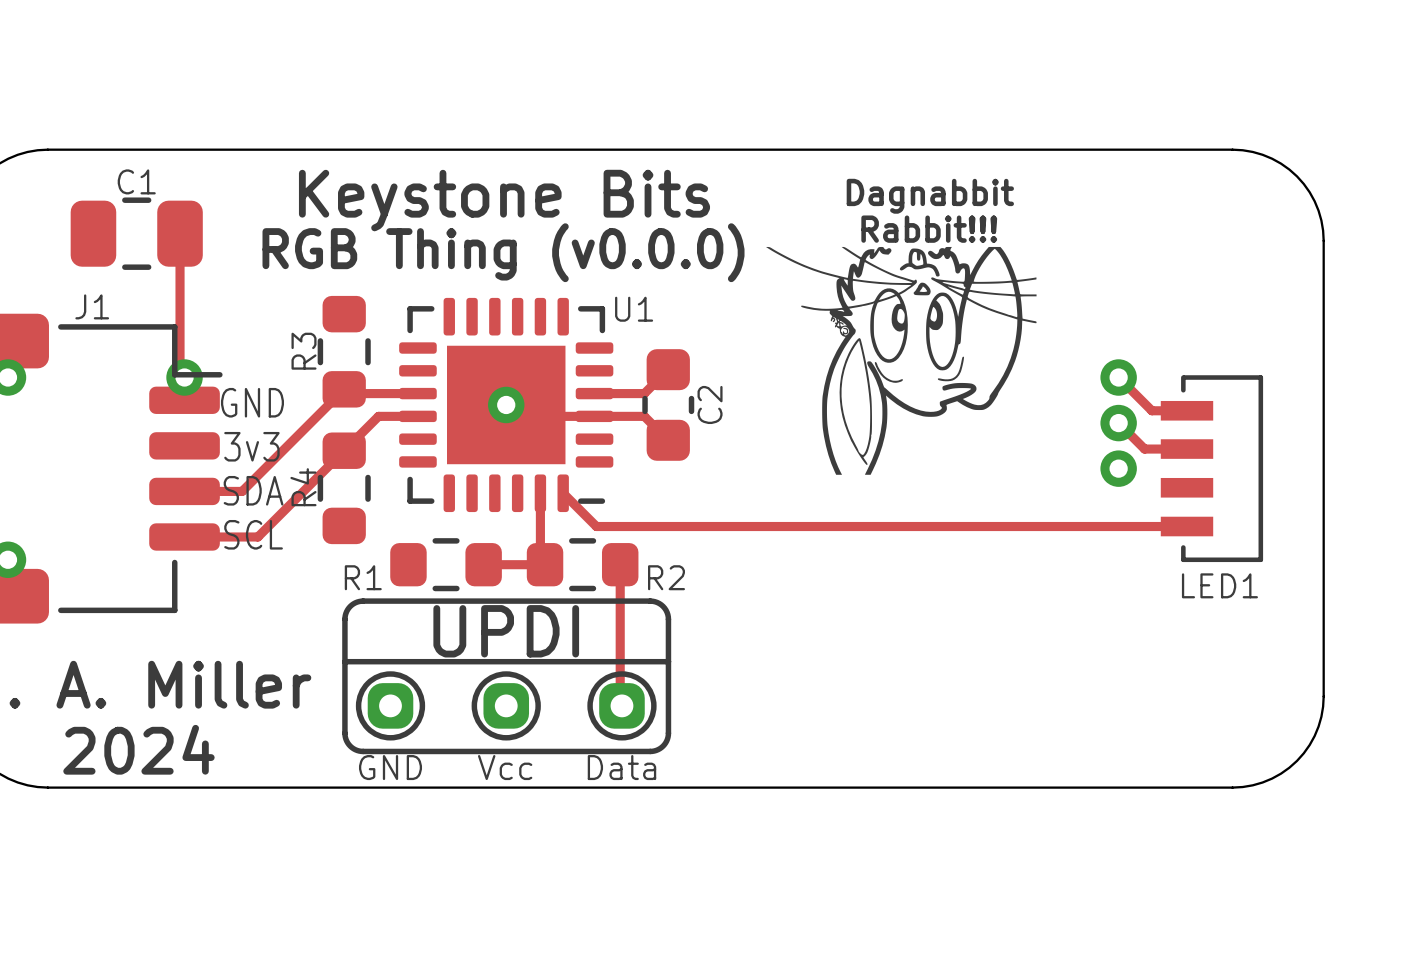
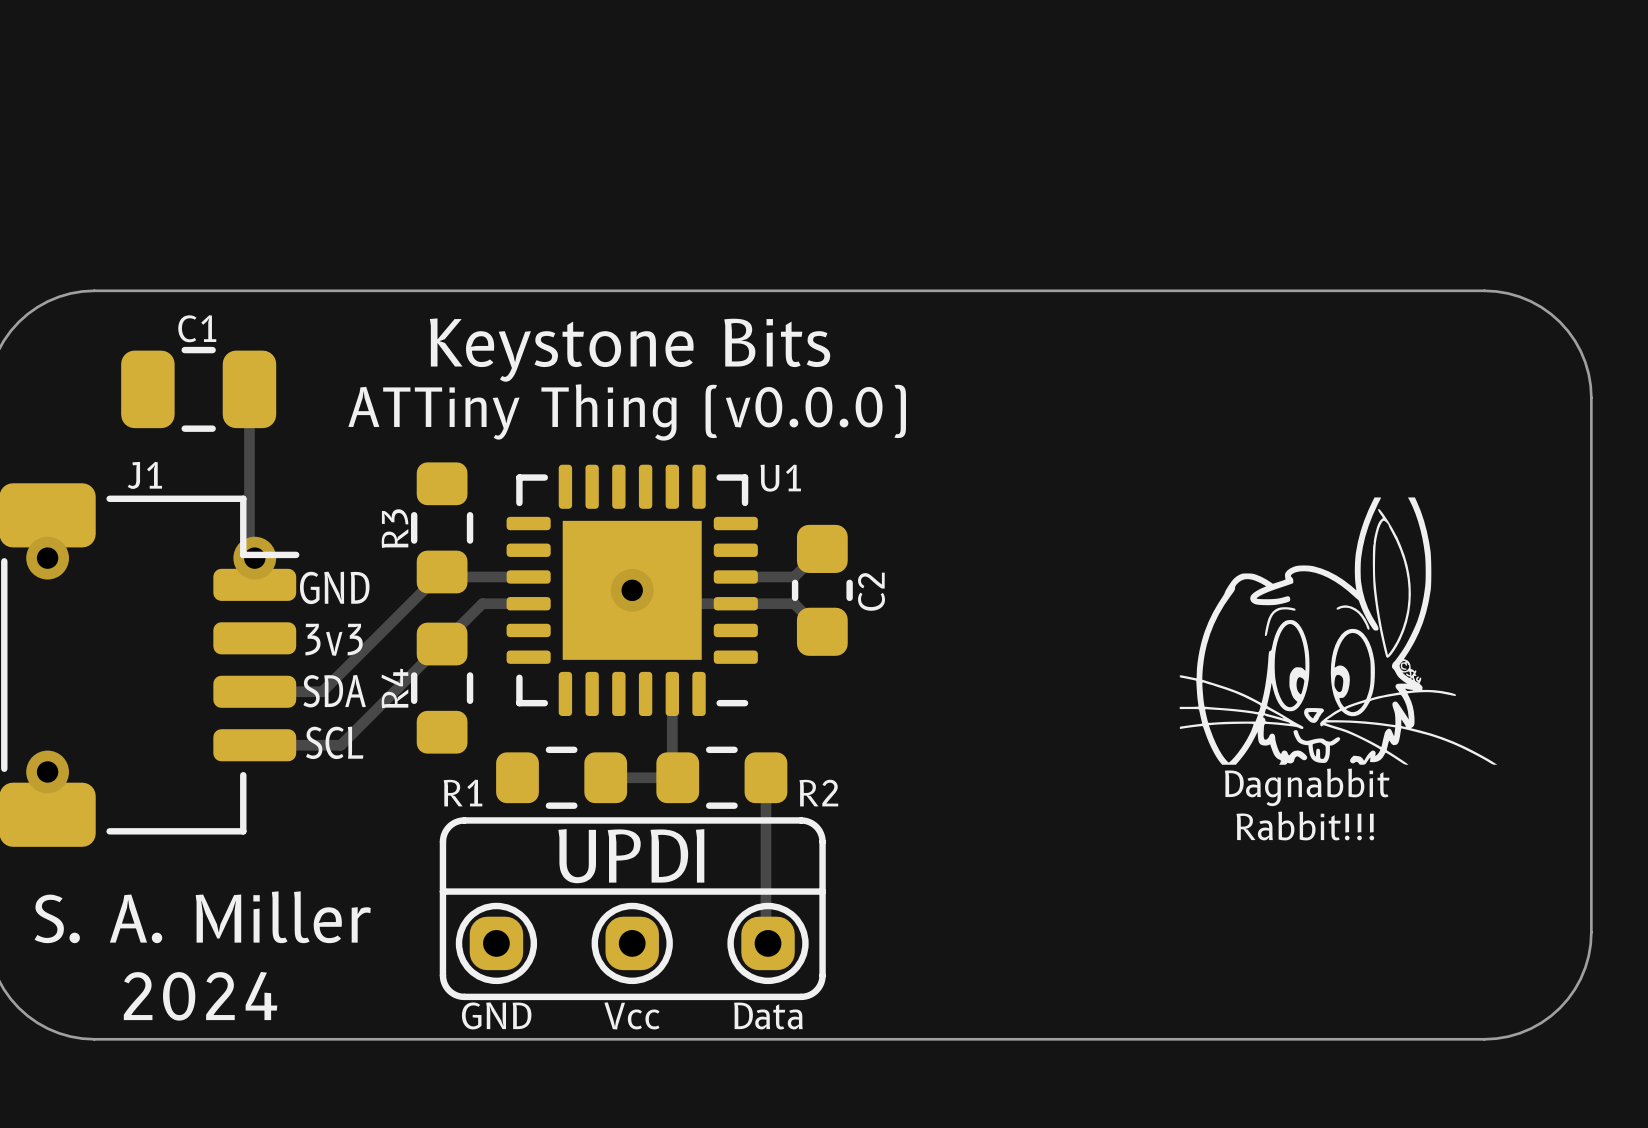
drawing: [766, 246, 1037, 475] -> none
text: RGB Thing (v0.0.0) (503, 252) -> ATTiny Thing (v0.0.0) (627, 412)
drawing: none -> [1179, 497, 1498, 765]
track: (1118, 377) (1151, 410) (1186, 410) -> none
via: (1118, 377) -> none
track: (1118, 423) (1144, 449) (1186, 449) -> none
via: (1118, 423) -> none
via: (1118, 468) -> none
LED1: (1211, 468) -> none
track: (563, 493) (596, 526) (1186, 526) -> none

